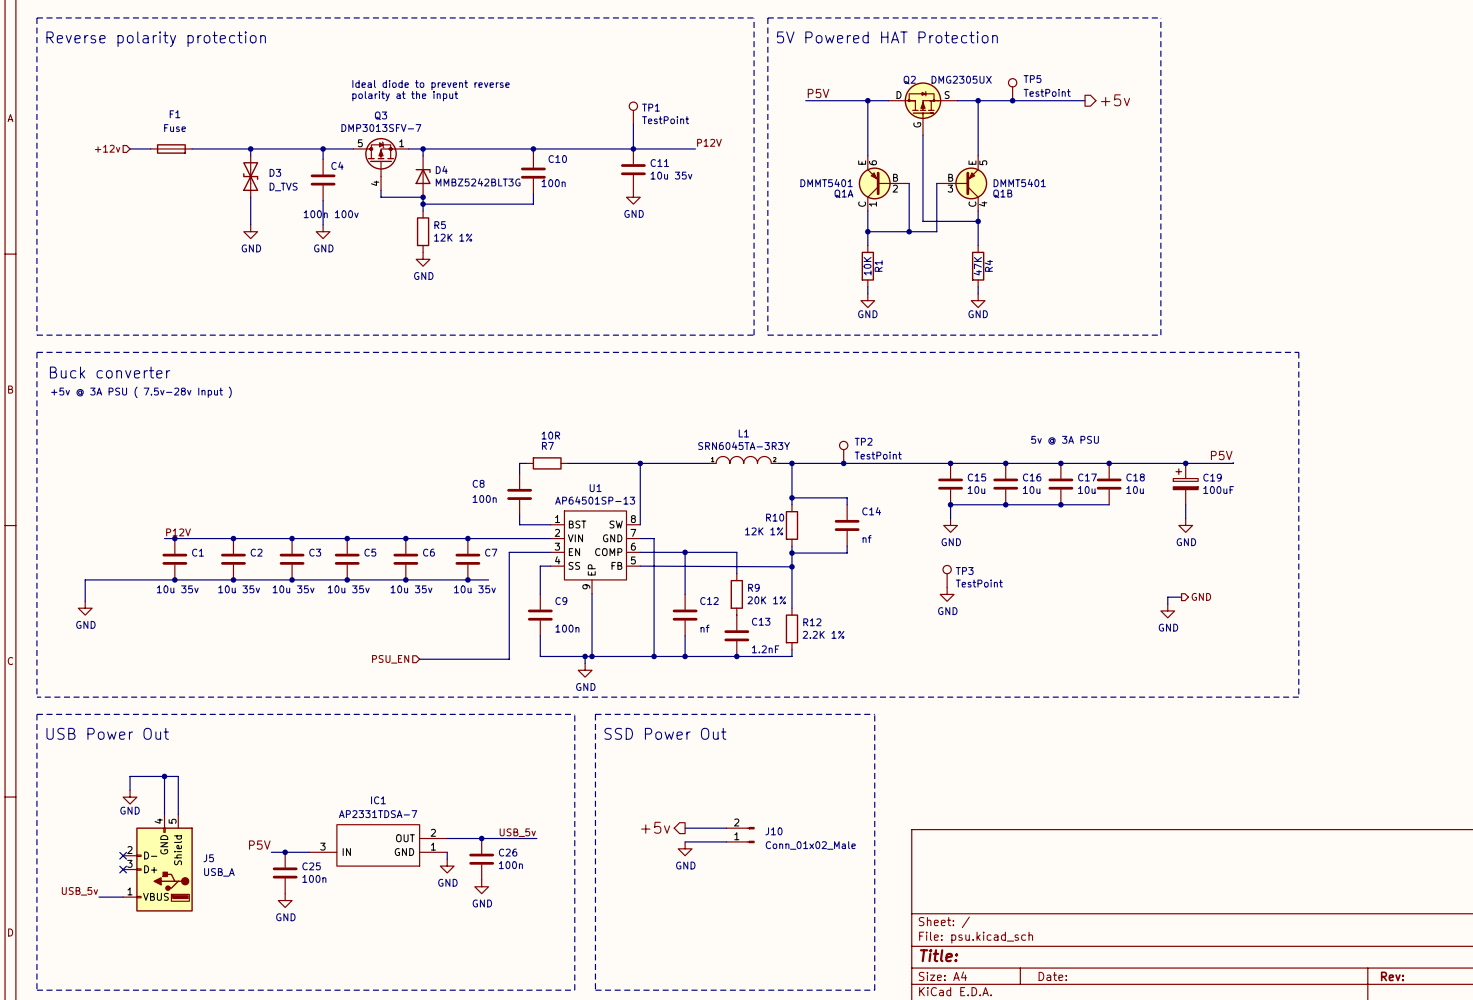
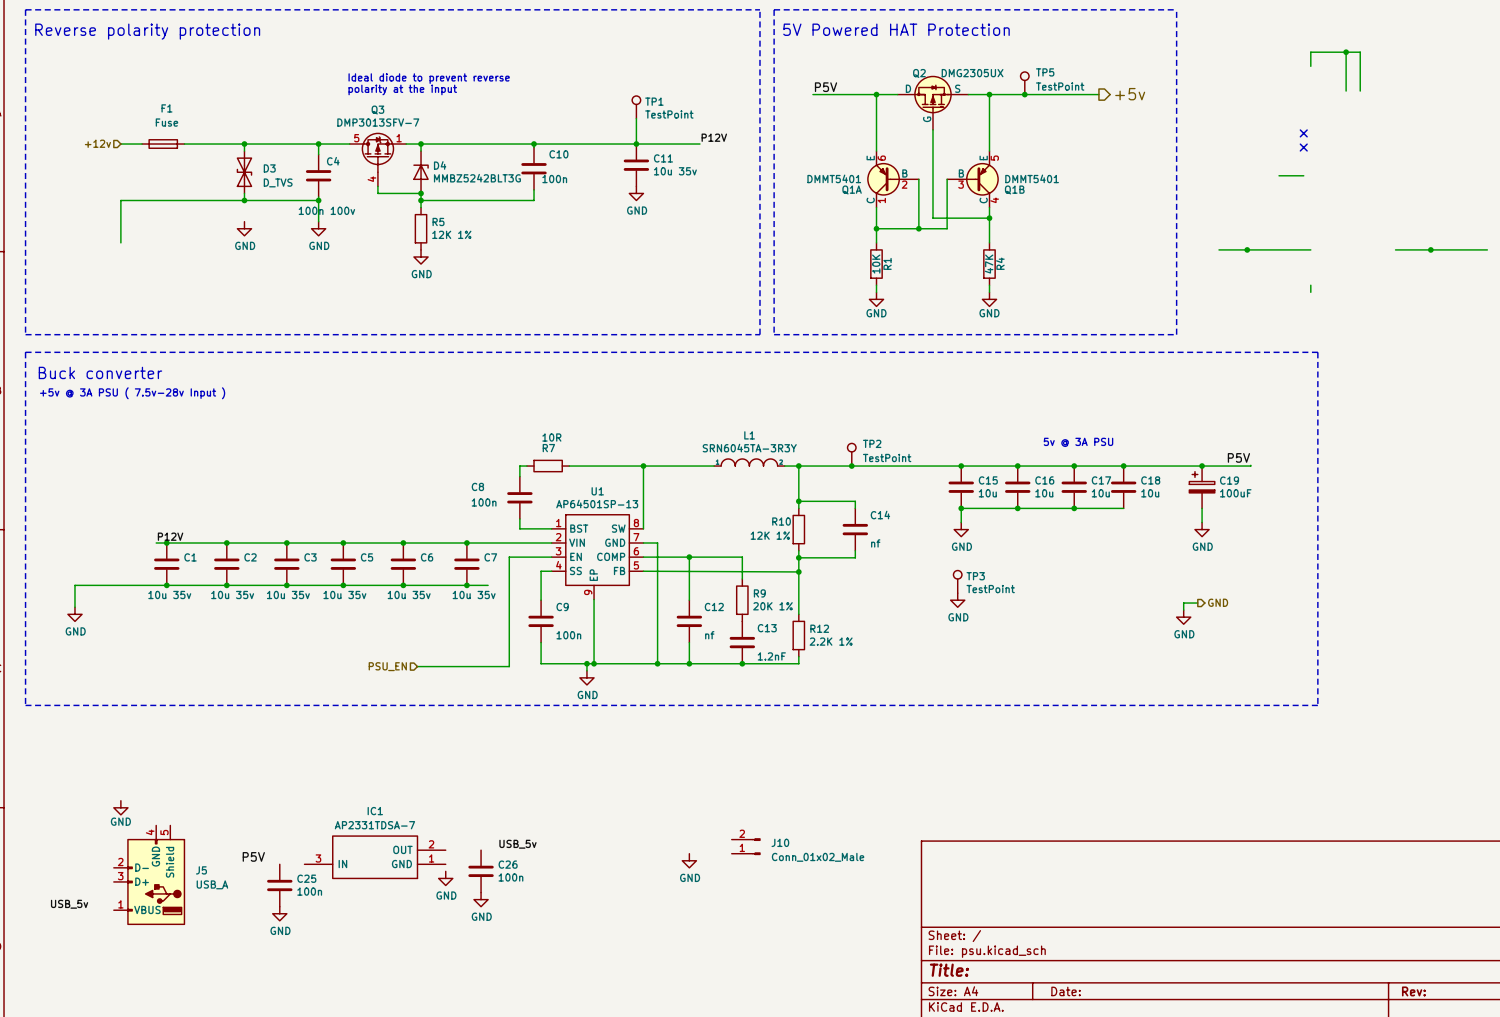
wire: none -> (1346, 52) (1346, 91)
junction: none -> (1346, 52)
wire: none -> (1310, 66) (1310, 52) (1360, 52) (1360, 91)
no-connect mark: none -> (1303, 133)
no-connect mark: none -> (1303, 147)
wire: none -> (1279, 175) (1303, 175)
wire: (250, 204) (250, 224) -> none
junction: none -> (244, 200)
wire: none -> (318, 200) (120, 200) (120, 242)
junction: none -> (318, 200)
wire: none -> (1219, 249) (1310, 249)
junction: none -> (1247, 249)
wire: none -> (1395, 249) (1487, 249)
junction: none -> (1430, 249)
wire: none -> (1310, 285) (1310, 292)
line: (36, 714) (36, 990) (574, 990) (574, 714) (36, 714) -> none
line: (595, 714) (874, 714) (874, 990) (595, 990) (595, 714) -> none
text: USB Power Out (107, 733) -> none
text: SSD Power Out (665, 733) -> none
wire: (164, 776) (164, 814) -> none
junction: (164, 776) -> none
wire: (130, 790) (130, 776) (178, 776) (178, 814) -> none
hierarchical label: +5v (655, 827) -> none
wire: (685, 828) (726, 828) -> none
wire: (447, 838) (536, 838) -> none
junction: (481, 838) -> none
wire: (685, 841) (726, 841) -> none
wire: (271, 852) (309, 852) -> none
junction: (285, 852) -> none
wire: (447, 852) (447, 859) -> none
no-connect mark: (123, 855) -> none
no-connect mark: (123, 869) -> none
wire: (99, 897) (123, 897) -> none

